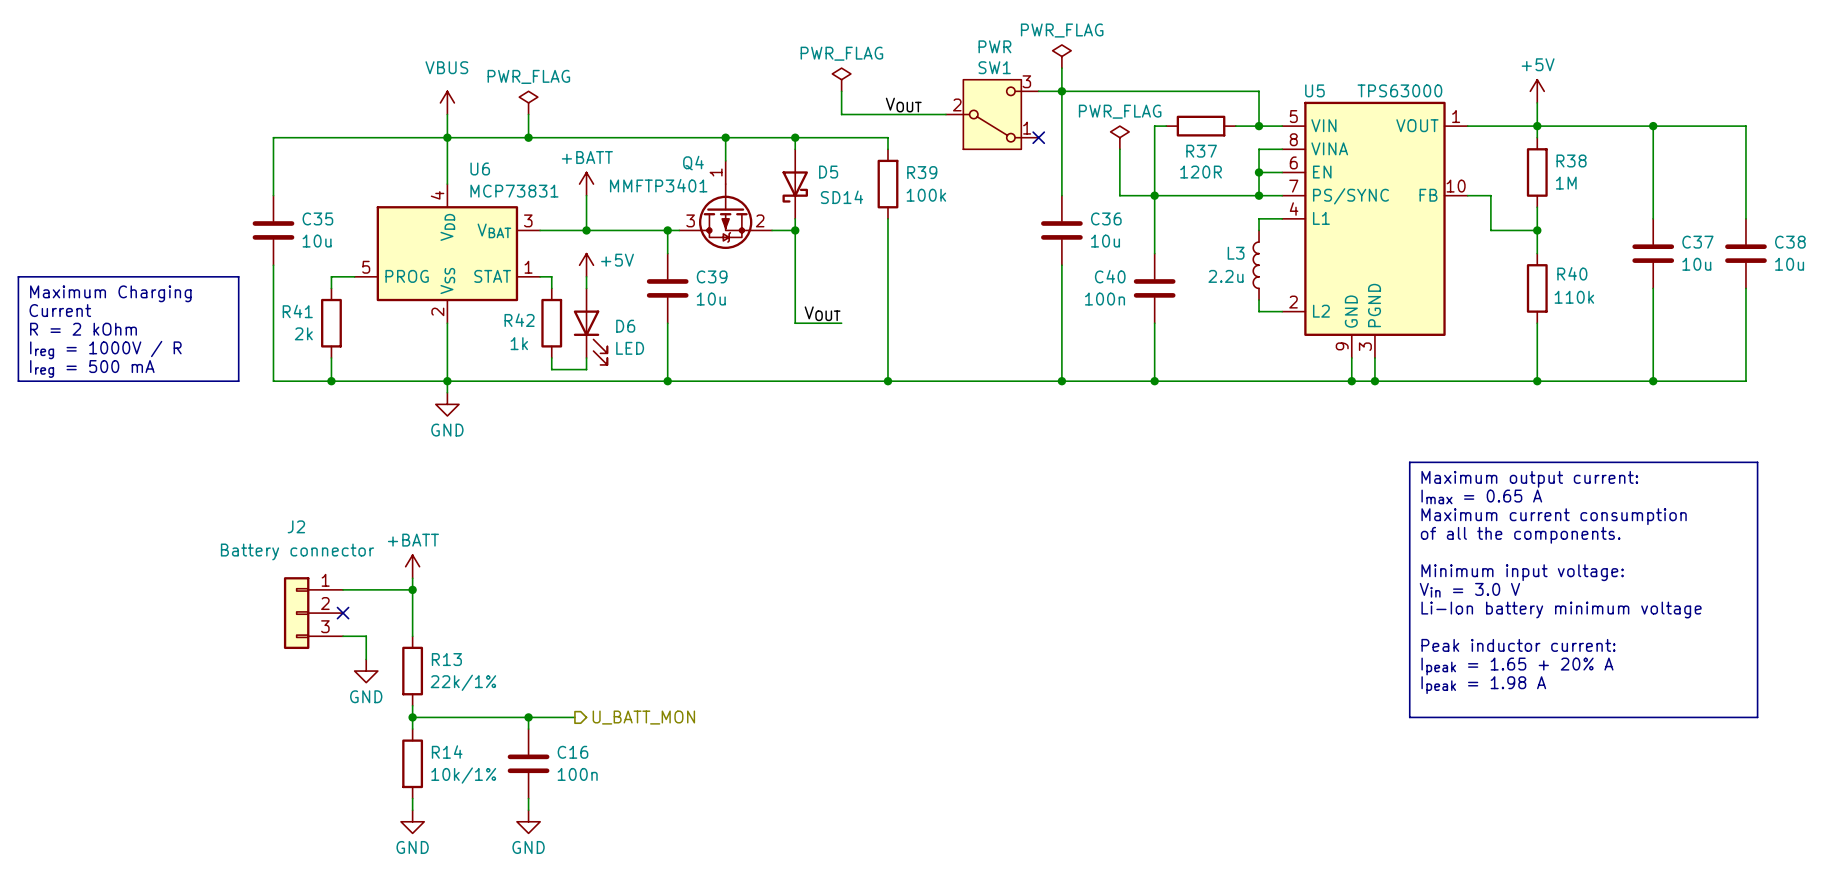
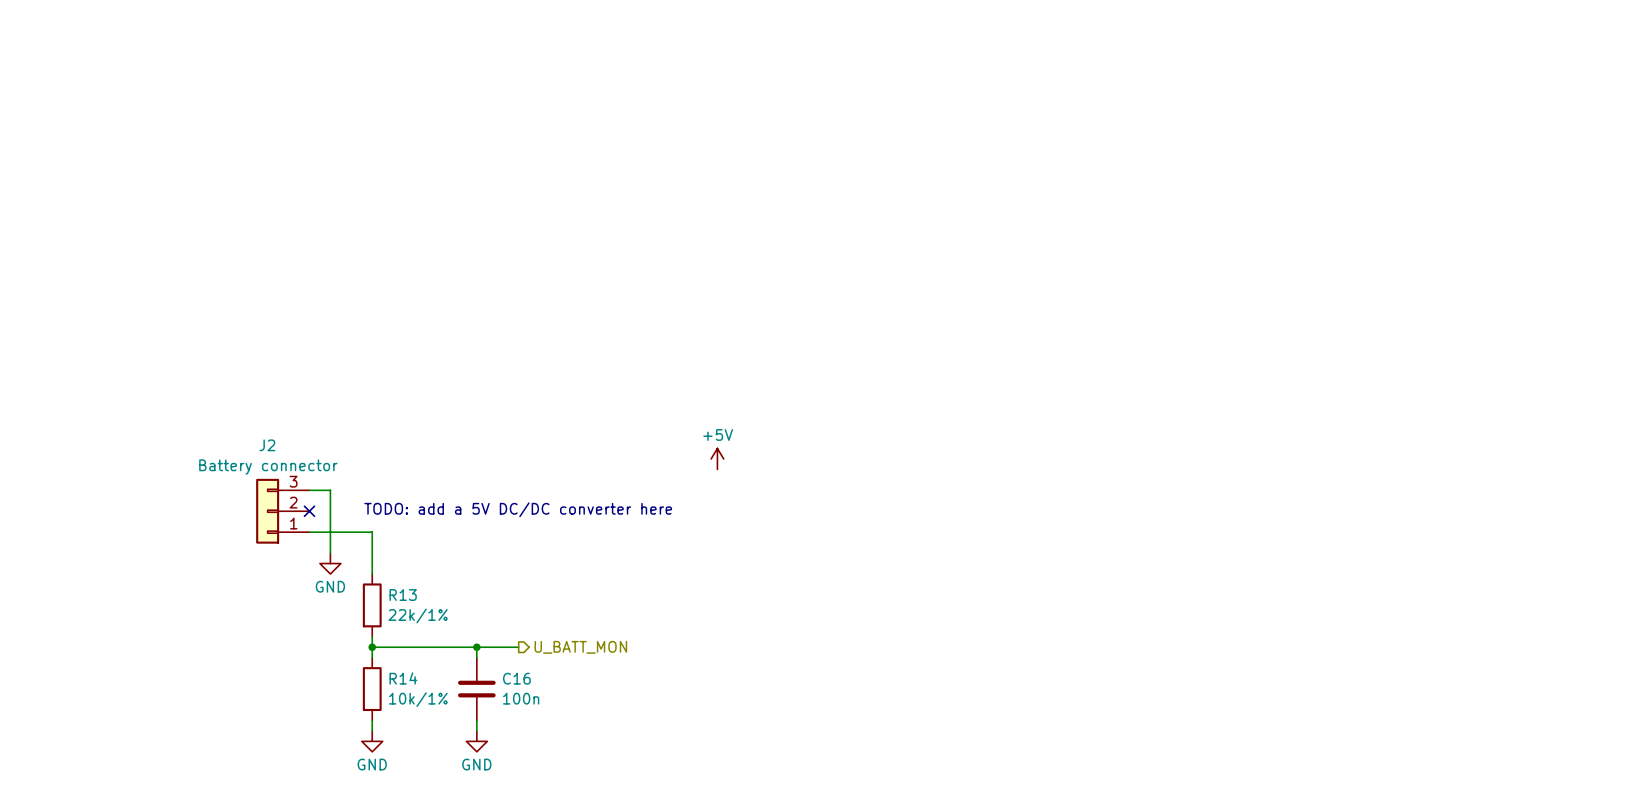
power symbol: PWR_FLAG (1061, 56) -> none
wire: (1061, 68) (1061, 195) -> none
power symbol: PWR_FLAG (841, 79) -> none
wire: (841, 91) (841, 114) (945, 114) -> none
wire: (1038, 91) (1259, 91) (1259, 126) -> none
junction: (1061, 91) -> none
power symbol: +5V (1537, 91) -> none
power symbol: VBUS (447, 102) -> none
power symbol: PWR_FLAG (528, 102) -> none
wire: (1537, 102) (1537, 137) -> none
label: VOUT (903, 105) -> none
wire: (447, 114) (447, 184) -> none
wire: (528, 114) (528, 137) -> none
SW1: PWR (992, 114) -> none
wire: (1166, 126) (1154, 126) (1154, 253) -> none
R37: 120R (1201, 126) -> none
wire: (1235, 126) (1282, 126) -> none
junction: (1259, 126) -> none
wire: (1467, 126) (1745, 126) (1745, 218) -> none
junction: (1537, 126) -> none
wire: (1653, 126) (1653, 218) -> none
junction: (1653, 126) -> none
junction: (447, 137) -> none
junction: (528, 137) -> none
wire: (725, 137) (725, 160) -> none
junction: (725, 137) -> none
wire: (795, 137) (795, 149) -> none
junction: (795, 137) -> none
no-connect mark: (1038, 137) -> none
power symbol: PWR_FLAG (1119, 137) -> none
wire: (887, 149) (887, 137) (273, 137) (273, 195) -> none
wire: (1119, 149) (1119, 195) (1282, 195) -> none
wire: (1282, 149) (1259, 149) (1259, 195) -> none
wire: (1259, 172) (1282, 172) -> none
junction: (1259, 172) -> none
R38: 1M (1537, 172) -> none
power symbol: +BATT (586, 184) -> none
D5: SD14 (795, 184) -> none
R39: 100k (887, 184) -> none
wire: (586, 195) (586, 230) -> none
junction: (1154, 195) -> none
junction: (1259, 195) -> none
wire: (1467, 195) (1490, 195) (1490, 230) (1537, 230) -> none
Q4: MMFTP3401 (725, 204) -> none
wire: (1537, 207) (1537, 253) -> none
wire: (795, 218) (795, 323) (841, 323) -> none
wire: (887, 218) (887, 381) -> none
wire: (1282, 218) (1259, 218) (1259, 230) -> none
U5: TPS63000 (1374, 229) -> none
C35: 10u (273, 230) -> none
wire: (540, 230) (679, 230) -> none
junction: (586, 230) -> none
wire: (667, 230) (667, 253) -> none
junction: (667, 230) -> none
wire: (772, 230) (795, 230) -> none
junction: (795, 230) -> none
C36: 10u (1061, 230) -> none
junction: (1537, 230) -> none
U6: MCP73831 (447, 253) -> none
C37: 10u (1653, 253) -> none
C38: 10u (1745, 253) -> none
wire: (273, 265) (273, 381) (1745, 381) (1745, 288) -> none
power symbol: +5V (586, 265) -> none
wire: (1061, 265) (1061, 381) -> none
L3: 2.2u (1256, 265) -> none
line: (18, 276) (238, 276) (238, 381) (18, 381) (18, 276) -> none
wire: (354, 276) (331, 276) (331, 288) -> none
wire: (540, 276) (551, 276) (551, 288) -> none
wire: (586, 276) (586, 288) -> none
C39: 10u (667, 288) -> none
C40: 100n (1154, 288) -> none
R40: 110k (1537, 288) -> none
wire: (1653, 288) (1653, 381) -> none
text: Maximum Charging (110, 293) -> none
wire: (1259, 300) (1259, 311) (1282, 311) -> none
text: Current (60, 310) -> none
label: VOUT (822, 313) -> none
R41: 2k (331, 323) -> none
wire: (447, 323) (447, 392) -> none
R42: 1k (551, 323) -> none
wire: (667, 323) (667, 381) -> none
wire: (1154, 323) (1154, 381) -> none
wire: (1537, 323) (1537, 381) -> none
D6: LED (590, 326) -> none
text: R = 2 kOhm (83, 329) -> none
text: Ireg = 1000V / R (105, 350) -> none
wire: (331, 358) (331, 381) -> none
wire: (551, 358) (551, 369) (586, 369) (586, 358) -> none
wire: (1351, 358) (1351, 381) -> none
wire: (1374, 358) (1374, 381) -> none
text: Ireg = 500 mA (92, 368) -> none
junction: (331, 381) -> none
junction: (447, 381) -> none
junction: (667, 381) -> none
junction: (887, 381) -> none
junction: (1061, 381) -> none
junction: (1154, 381) -> none
junction: (1351, 381) -> none
junction: (1374, 381) -> none
junction: (1537, 381) -> none
junction: (1653, 381) -> none
power symbol: GND (447, 404) -> none
line: (1409, 462) (1757, 462) (1757, 717) (1409, 717) (1409, 462) -> none
text: Maximum output current: (1529, 479) -> none
text: Imax = 0.65 A (1481, 496) -> none
power symbol: none -> +5V (717, 458)
text: Maximum current consumption (1554, 516) -> none
text: of all the components. (1520, 535) -> none
wire: none -> (309, 490) (330, 490) (330, 553)
text: none -> TODO: add a 5V DC/DC converter here (518, 509)
power symbol: +BATT (412, 566) -> none
text: Minimum input voltage: (1522, 572) -> none
wire: (412, 578) (412, 589) -> none
junction: (412, 589) -> none
text: Vin = 3.0 V (1469, 590) -> none
text: Li-Ion battery minimum voltage (1561, 609) -> none
J2 flip: as is (296, 613) -> up-down (267, 511)
J2 position: (313, 613) -> (282, 511)
no-connect mark position: (343, 613) -> (309, 511)
wire: (343, 636) (366, 636) (366, 659) -> none
text: Peak inductor current: (1518, 645) -> none
text: Ipeak = 1.65 + 20% A (1517, 666) -> none
power symbol position: GND (366, 671) -> GND (330, 563)
text: Ipeak = 1.98 A (1483, 685) -> none

